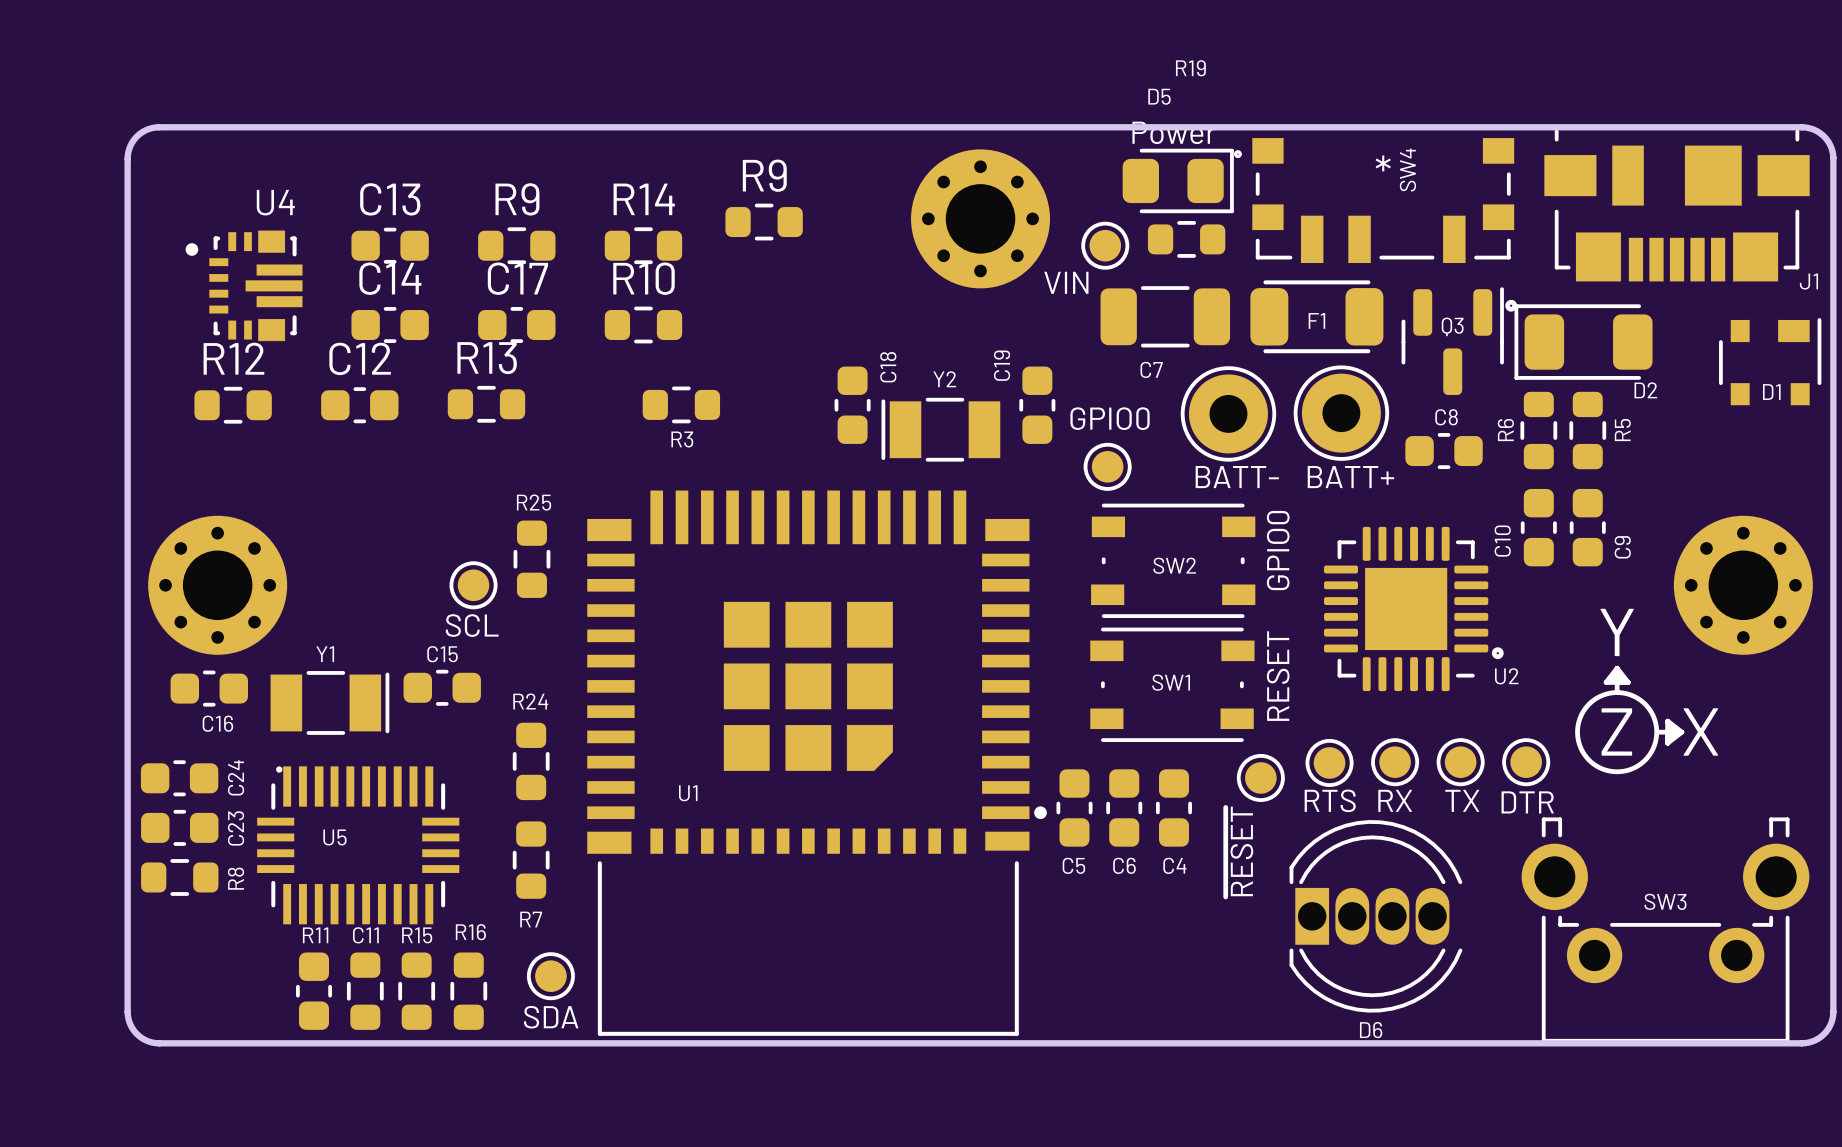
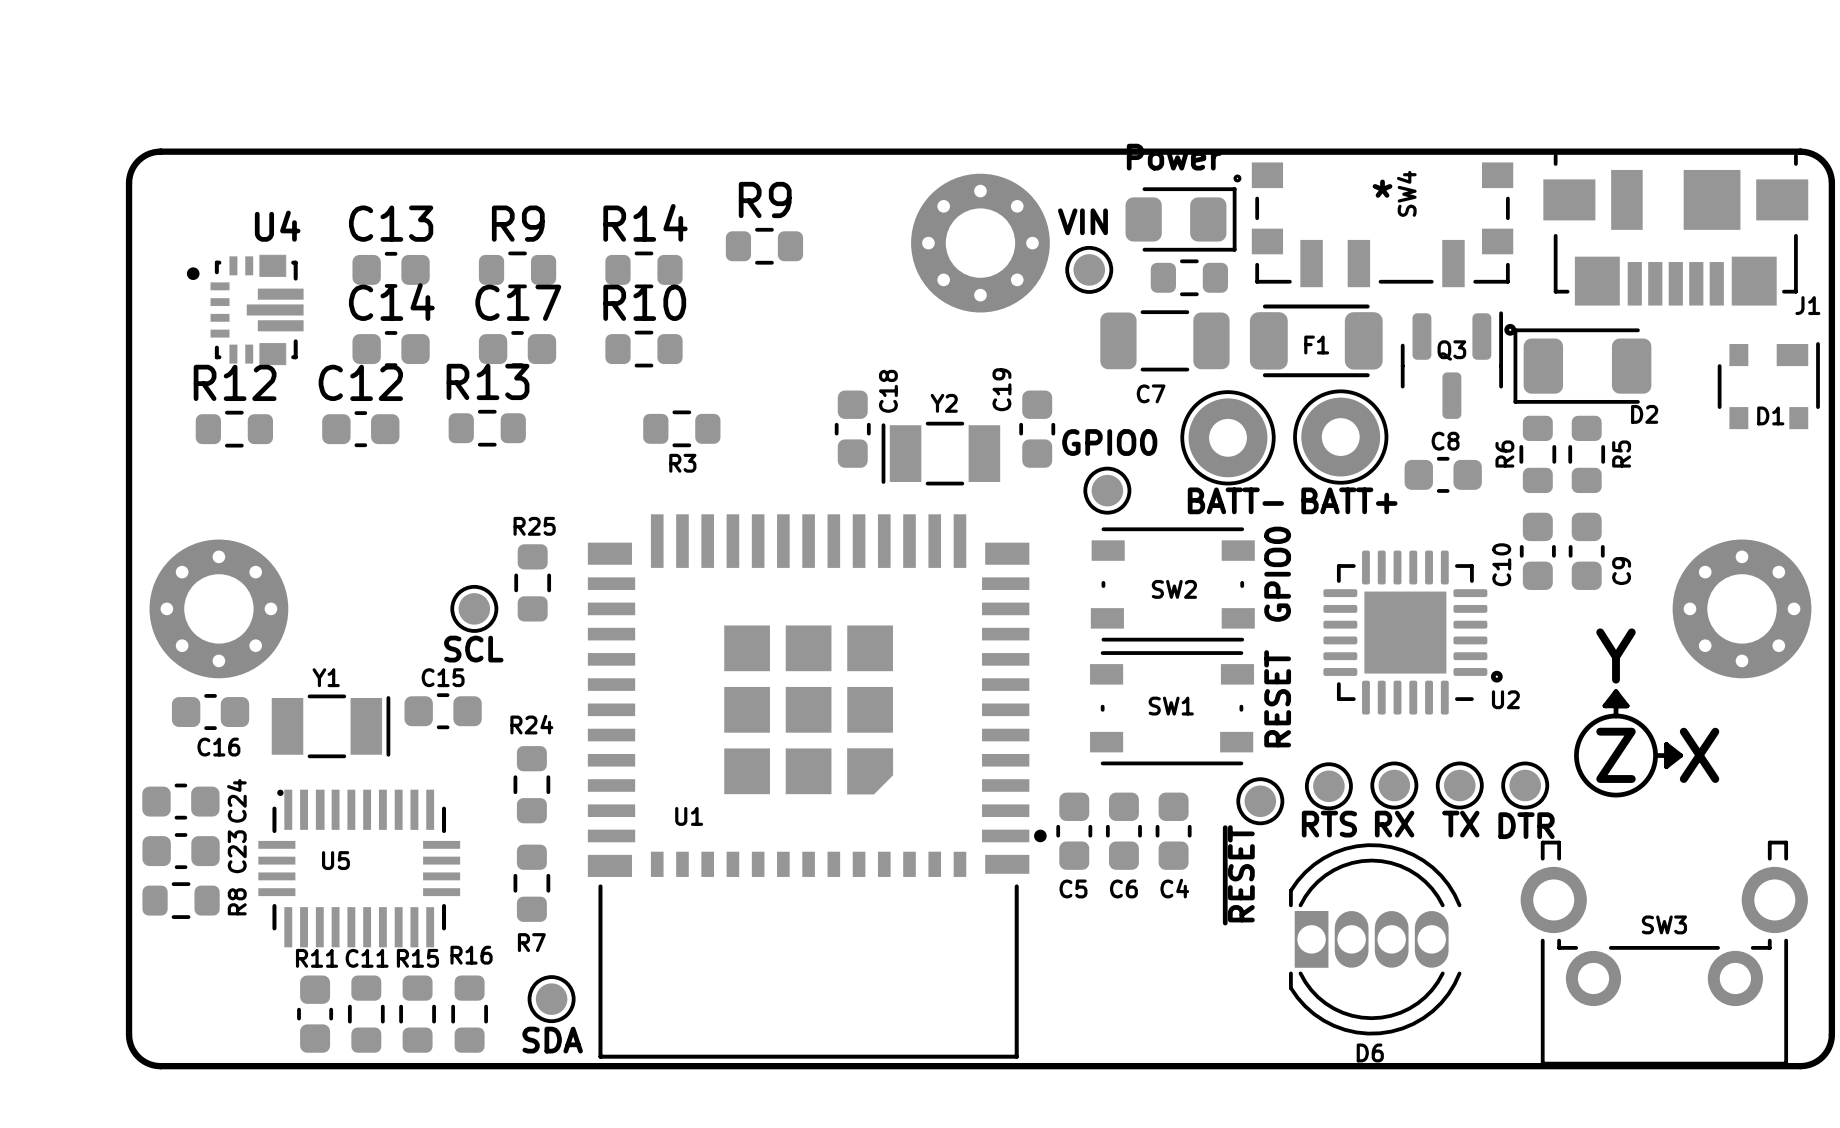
R19 name: R19 (1190, 68) -> none
D5 name: D5 (1159, 96) -> none
D5 position: (1178, 180) -> (1181, 219)
R19 position: (1186, 239) -> (1189, 277)
part position: (1105, 245) -> (1089, 269)
text position: VIN (1066, 282) -> VIN (1082, 221)

